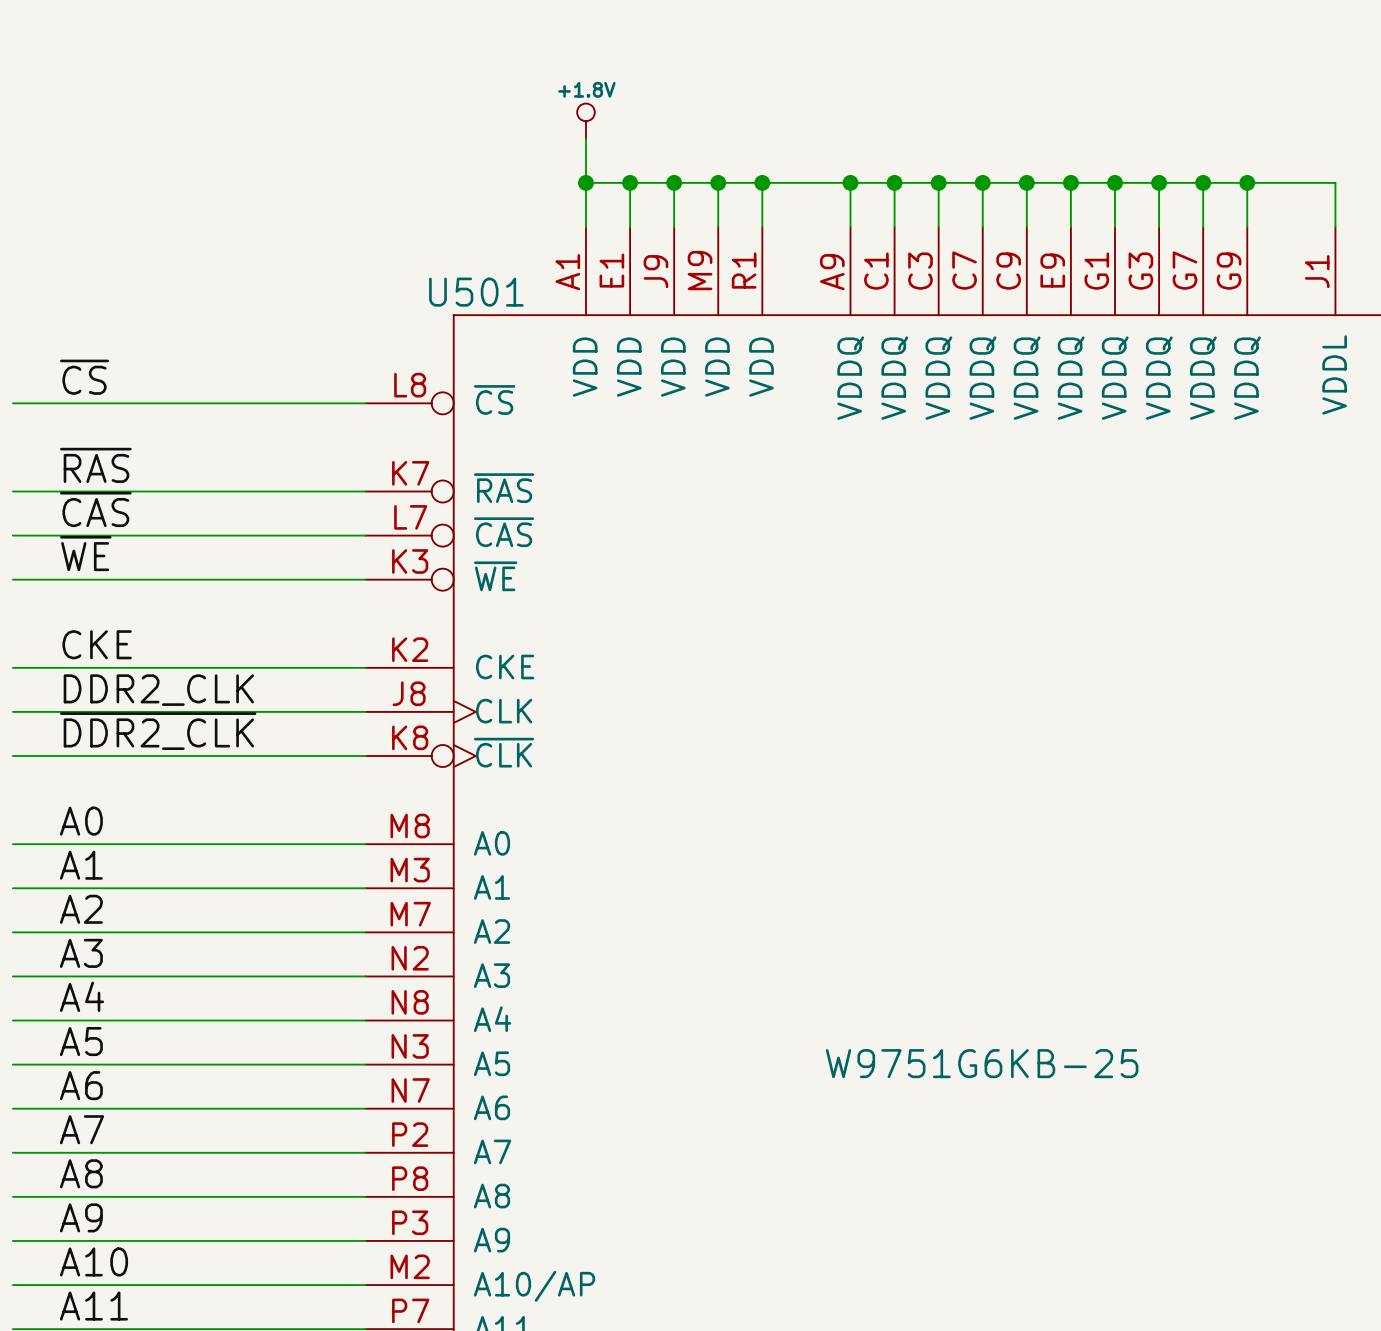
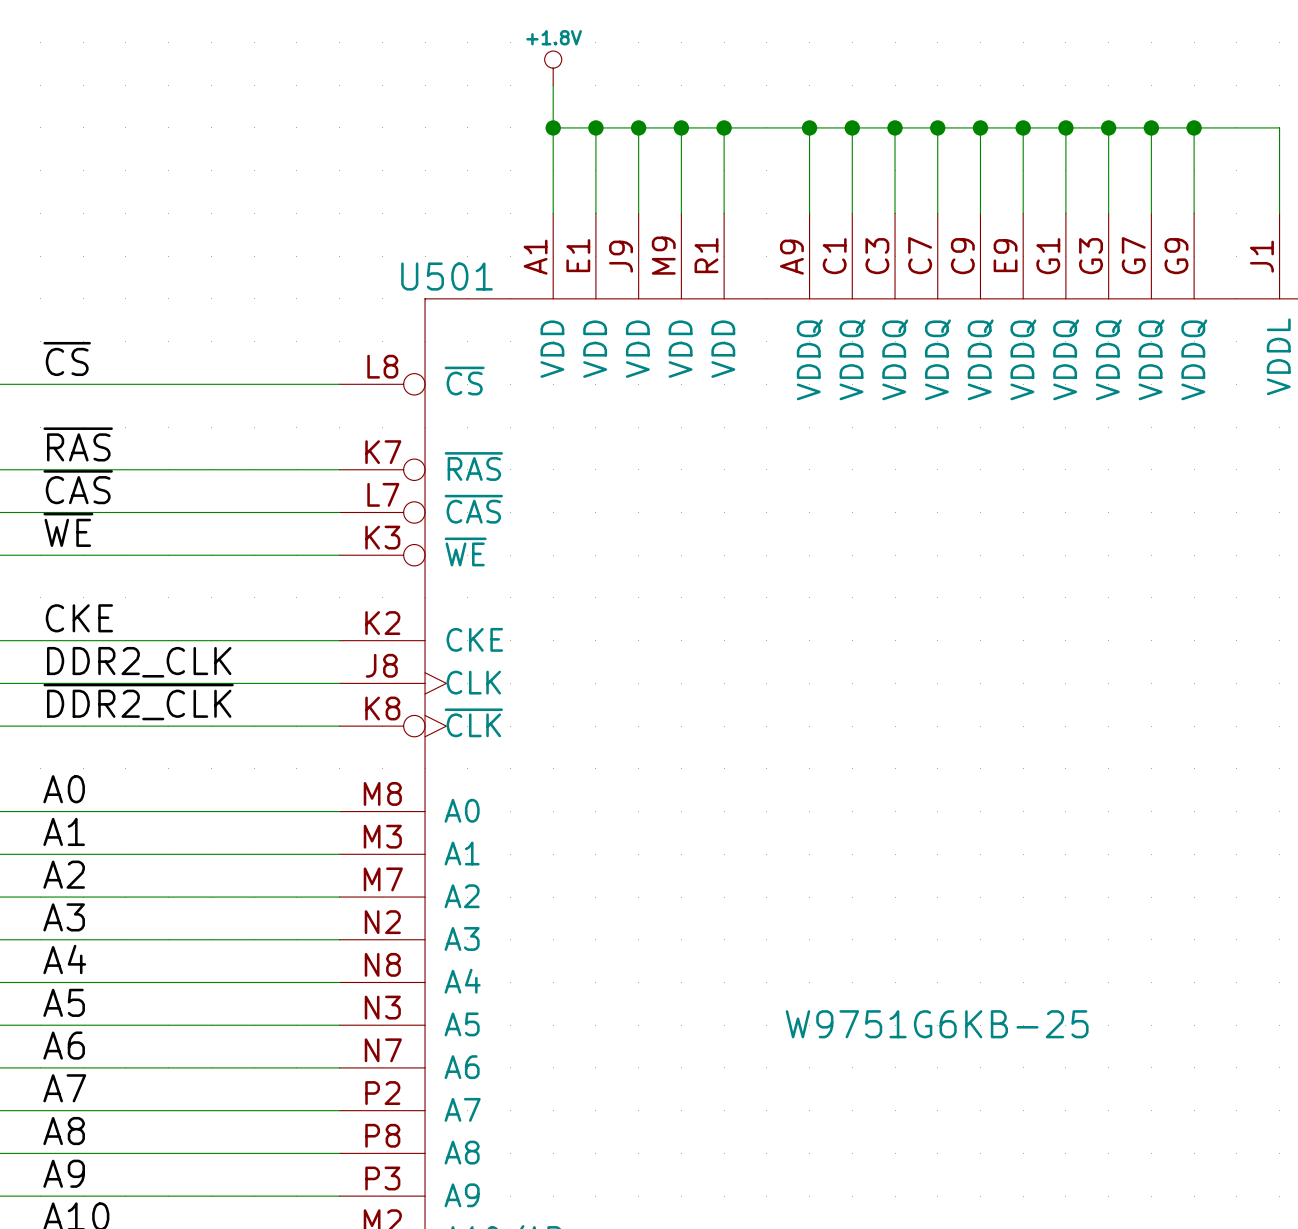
power symbol position: +1.8V (585, 121) -> +1.8V (553, 68)
junction: none -> (553, 127)
wire: none -> (595, 127) (595, 170)
junction: none -> (595, 127)
wire: none -> (638, 127) (638, 170)
junction: none -> (638, 127)
wire: none -> (681, 127) (681, 170)
junction: none -> (681, 127)
wire: none -> (724, 127) (724, 170)
junction: none -> (724, 127)
wire: none -> (809, 127) (809, 170)
junction: none -> (809, 127)
wire: none -> (852, 127) (852, 170)
junction: none -> (852, 127)
wire: none -> (895, 127) (895, 170)
junction: none -> (895, 127)
wire: none -> (937, 127) (937, 170)
junction: none -> (937, 127)
wire: none -> (980, 127) (980, 170)
junction: none -> (980, 127)
wire: none -> (1023, 127) (1023, 170)
junction: none -> (1023, 127)
wire: none -> (1065, 127) (1065, 170)
junction: none -> (1065, 127)
wire: none -> (1108, 127) (1108, 170)
junction: none -> (1108, 127)
wire: none -> (1151, 127) (1151, 170)
junction: none -> (1151, 127)
wire: none -> (1194, 127) (1194, 170)
junction: none -> (1194, 127)
wire: (585, 182) (1335, 182) -> (553, 85) (553, 127) (1279, 127) (1279, 170)
junction: (585, 182) -> none
junction: (630, 182) -> none
junction: (674, 182) -> none
junction: (718, 182) -> none
junction: (762, 182) -> none
junction: (850, 182) -> none
junction: (894, 182) -> none
junction: (938, 182) -> none
junction: (982, 182) -> none
junction: (1026, 182) -> none
junction: (1070, 182) -> none
junction: (1115, 182) -> none
junction: (1159, 182) -> none
junction: (1203, 182) -> none
junction: (1247, 182) -> none

